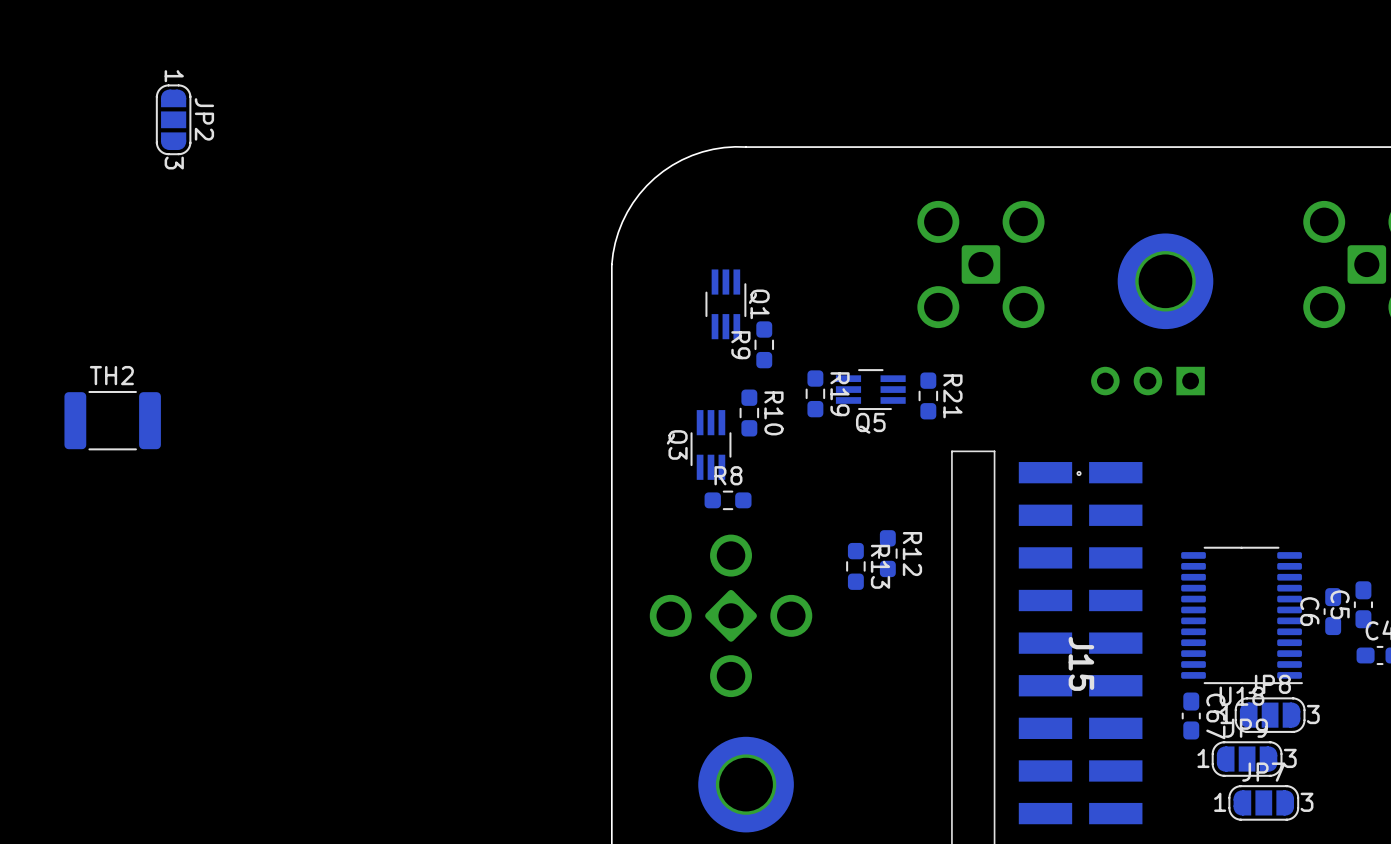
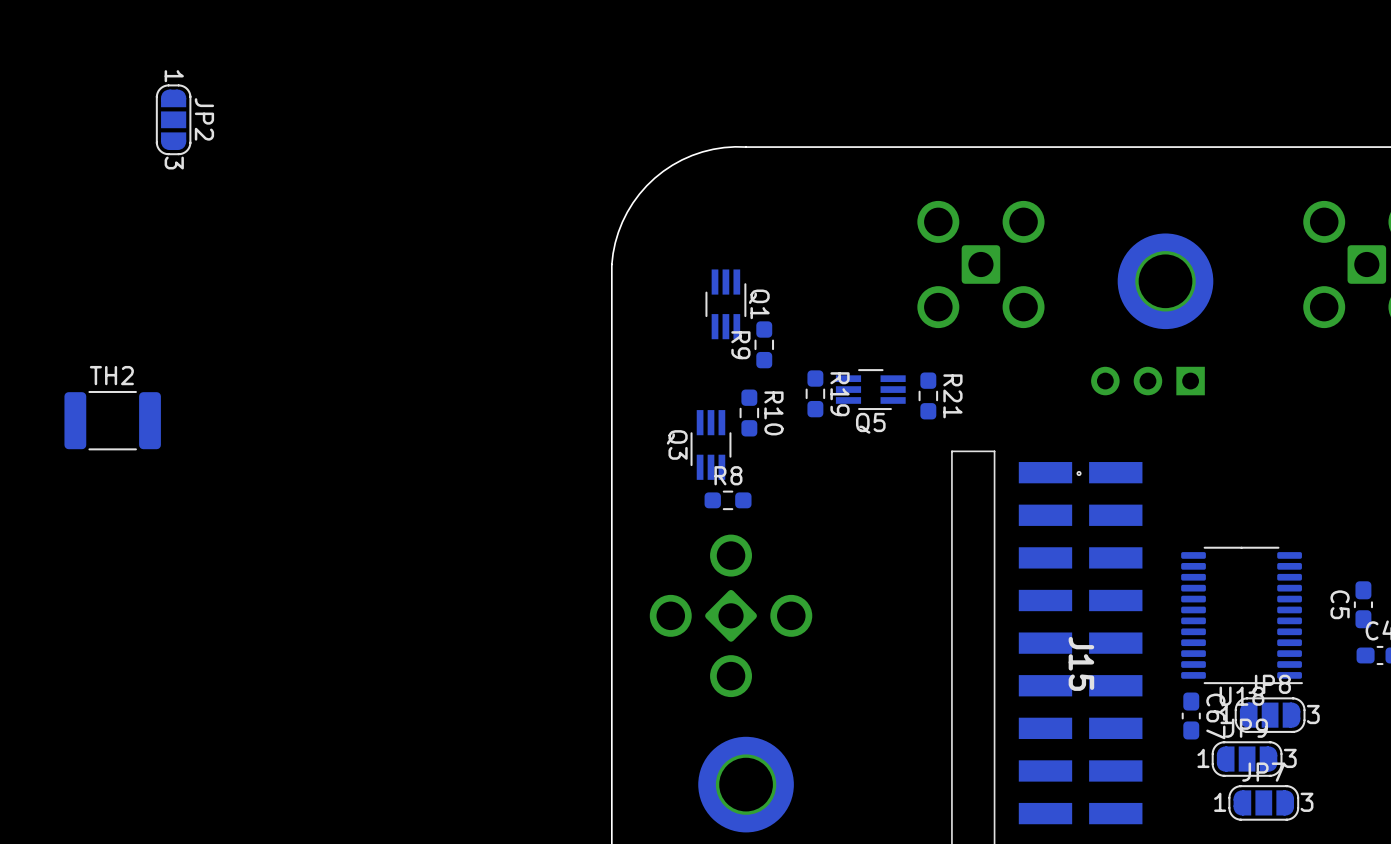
R12: (887, 553) -> none
R13: (855, 566) -> none
C6: (1333, 611) -> none

